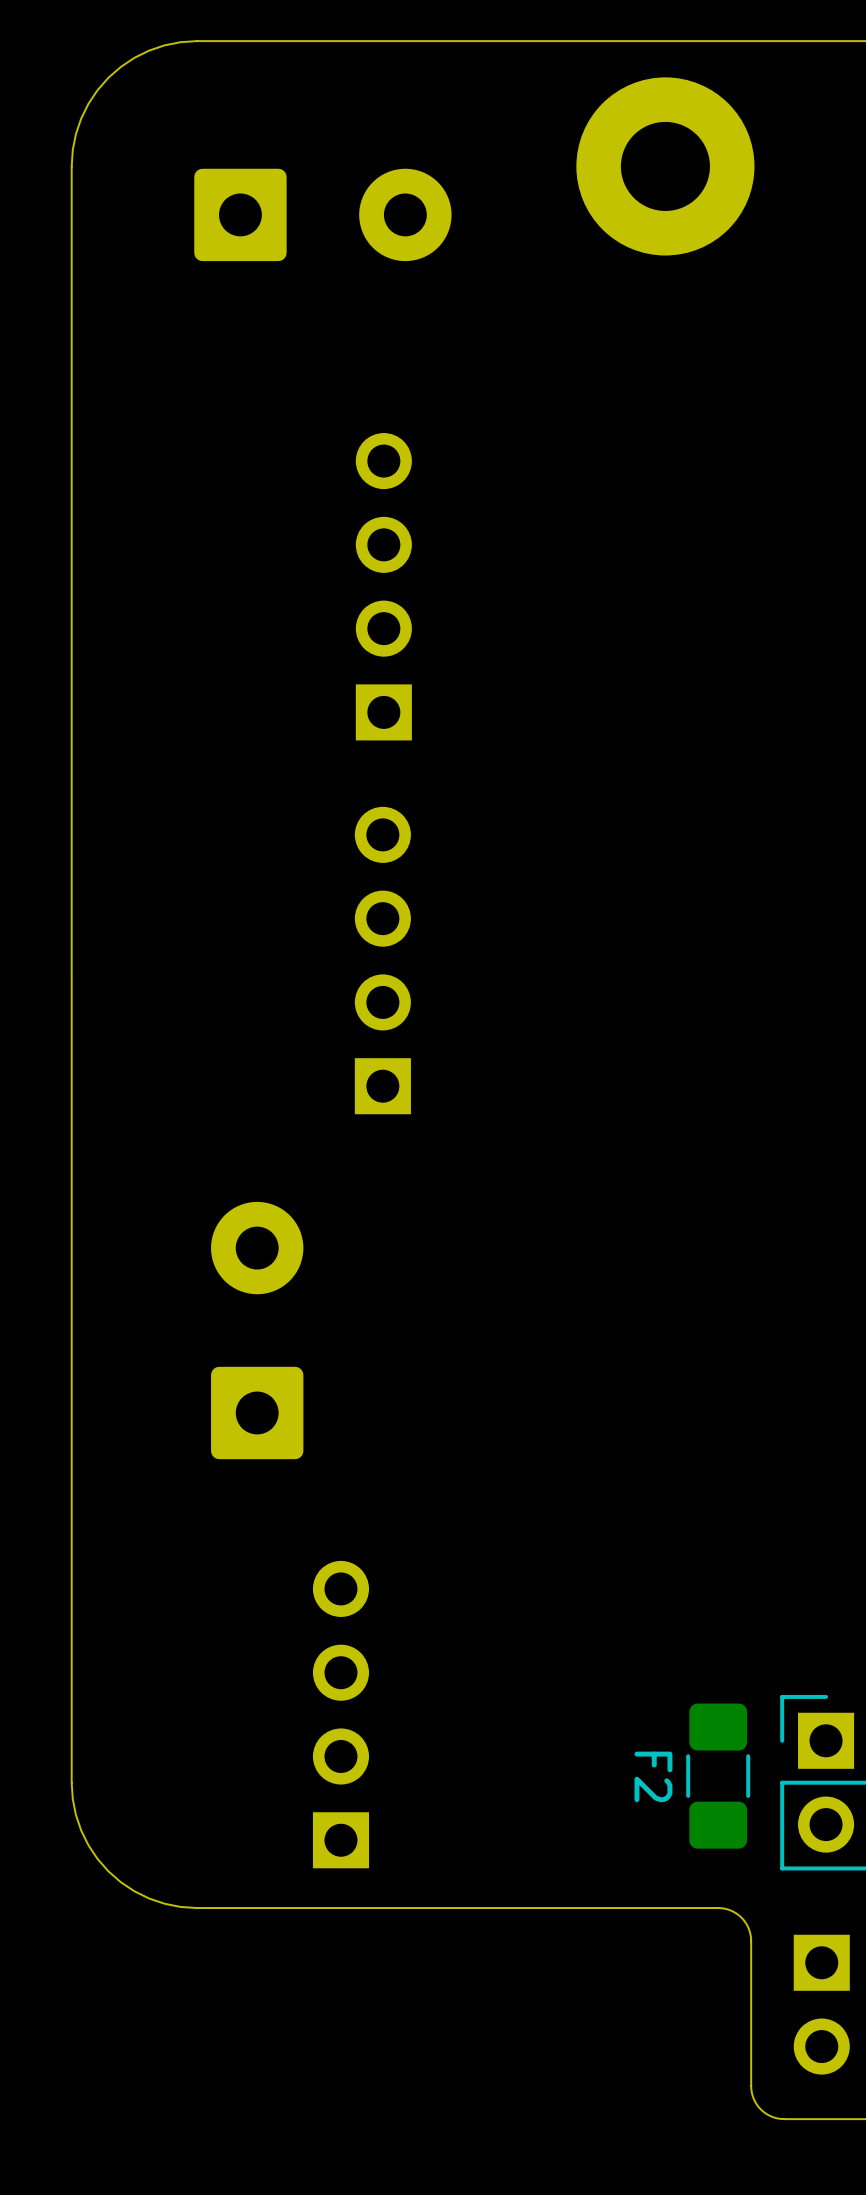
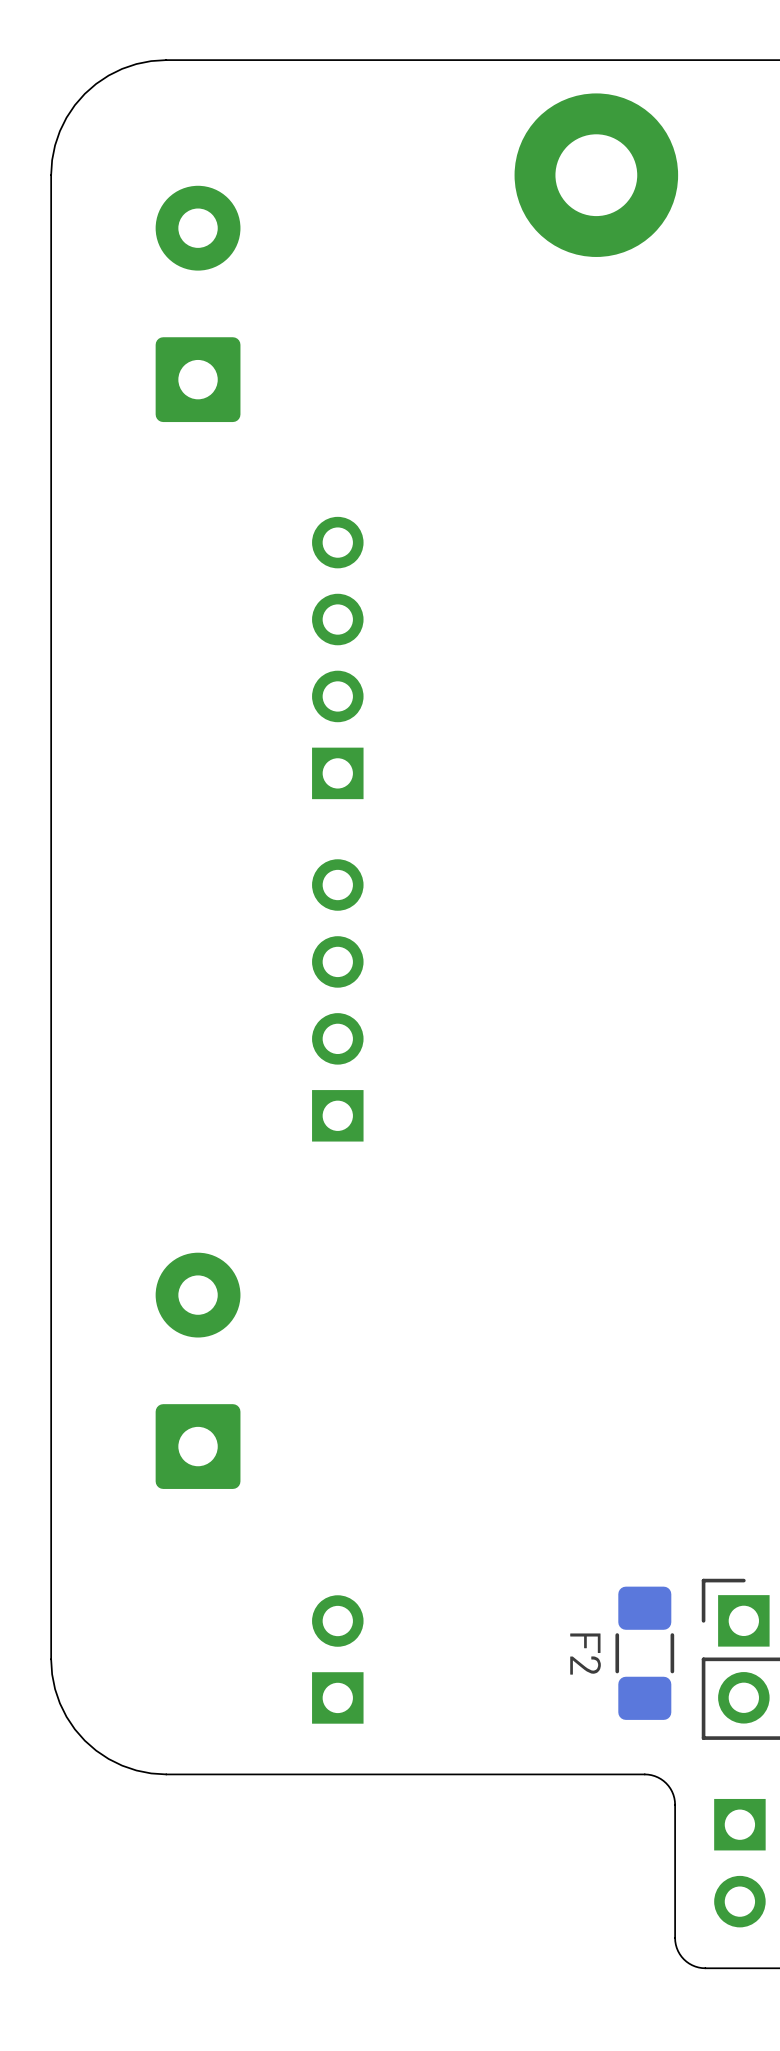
part rotation: 0° (322, 214) -> 90° counterclockwise (198, 303)
part position: (383, 586) -> (337, 657)
part position: (382, 960) -> (337, 1000)
part position: (257, 1330) -> (198, 1370)
part: (340, 1714) -> none
part: none -> (337, 1659)

